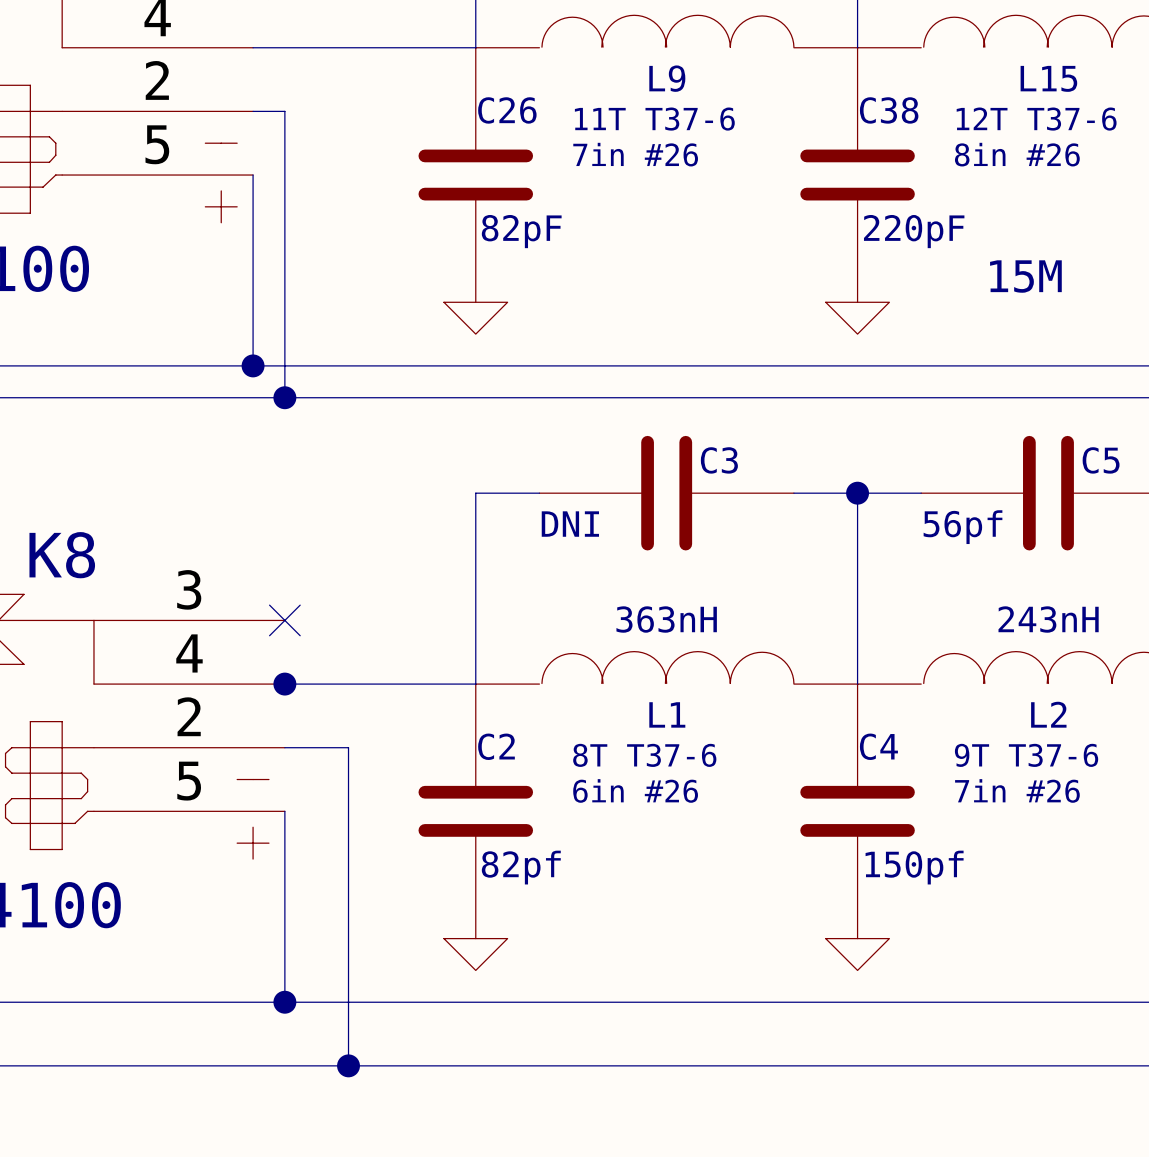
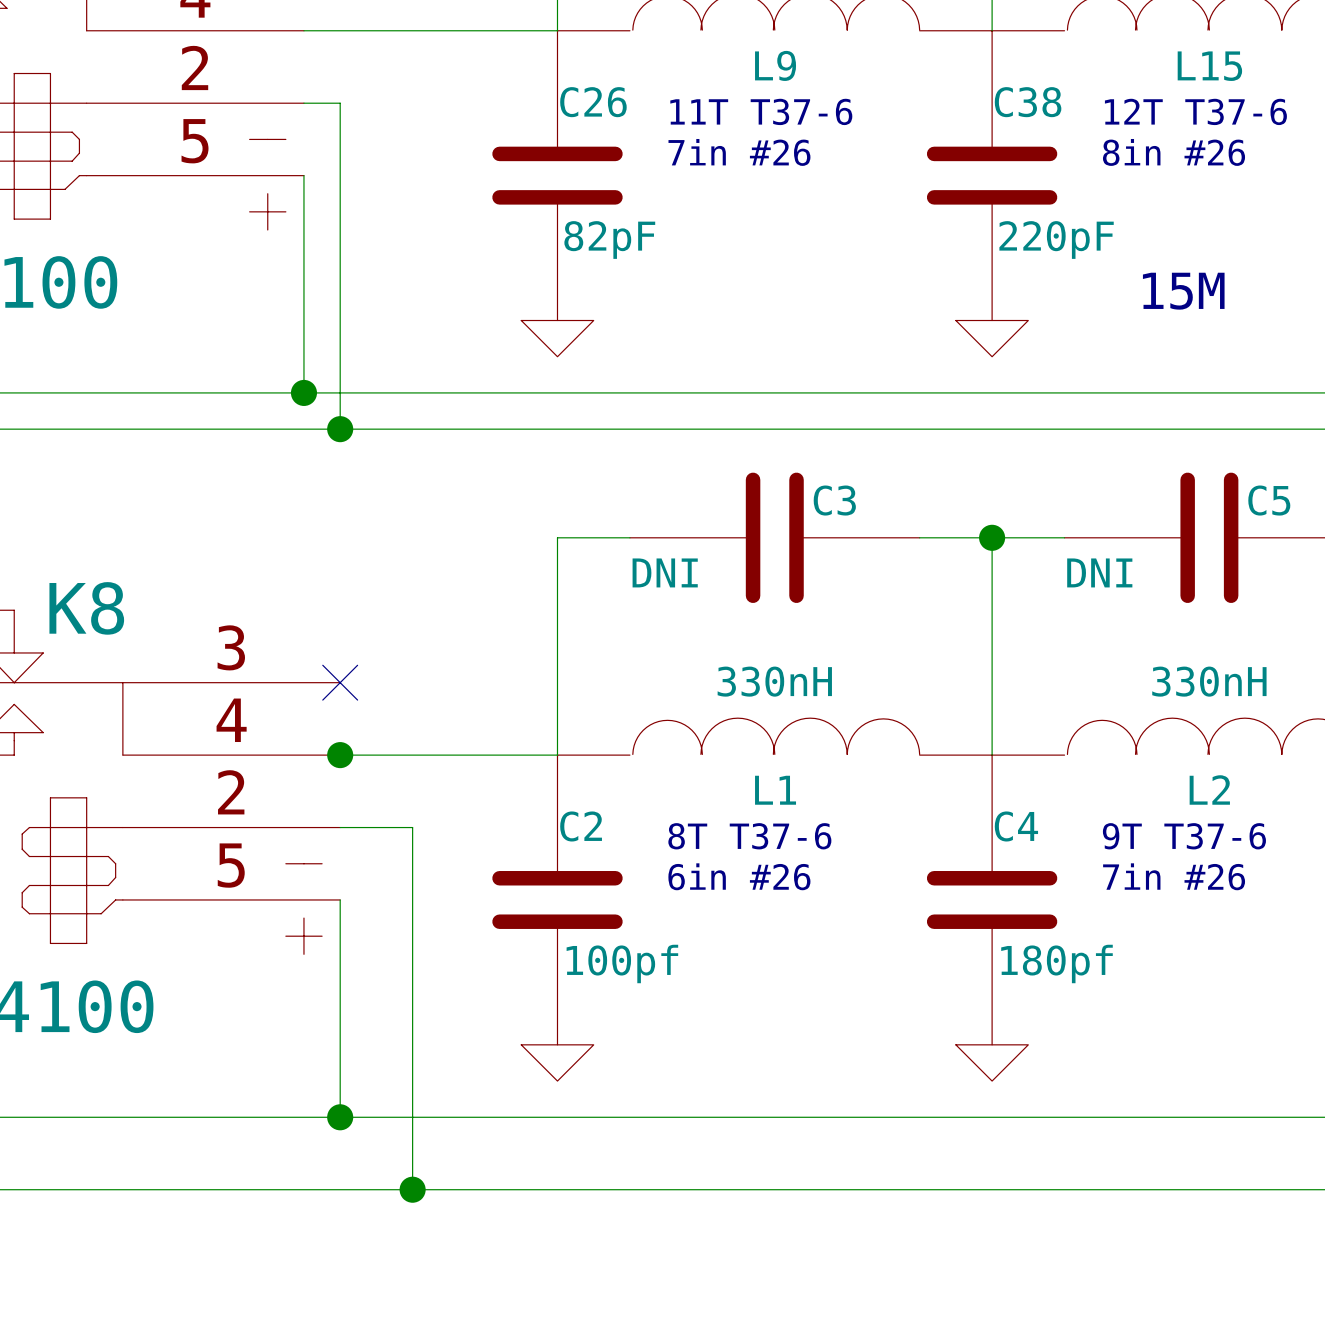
C5 value: 56pf (963, 527) -> DNI (1099, 572)
L1 value: 363nH (666, 619) -> 330nH (774, 681)
L2 value: 243nH (1048, 619) -> 330nH (1209, 681)
C2 value: 82pf (521, 867) -> 100pf (622, 963)
C4 value: 150pf (914, 867) -> 180pf (1056, 963)

